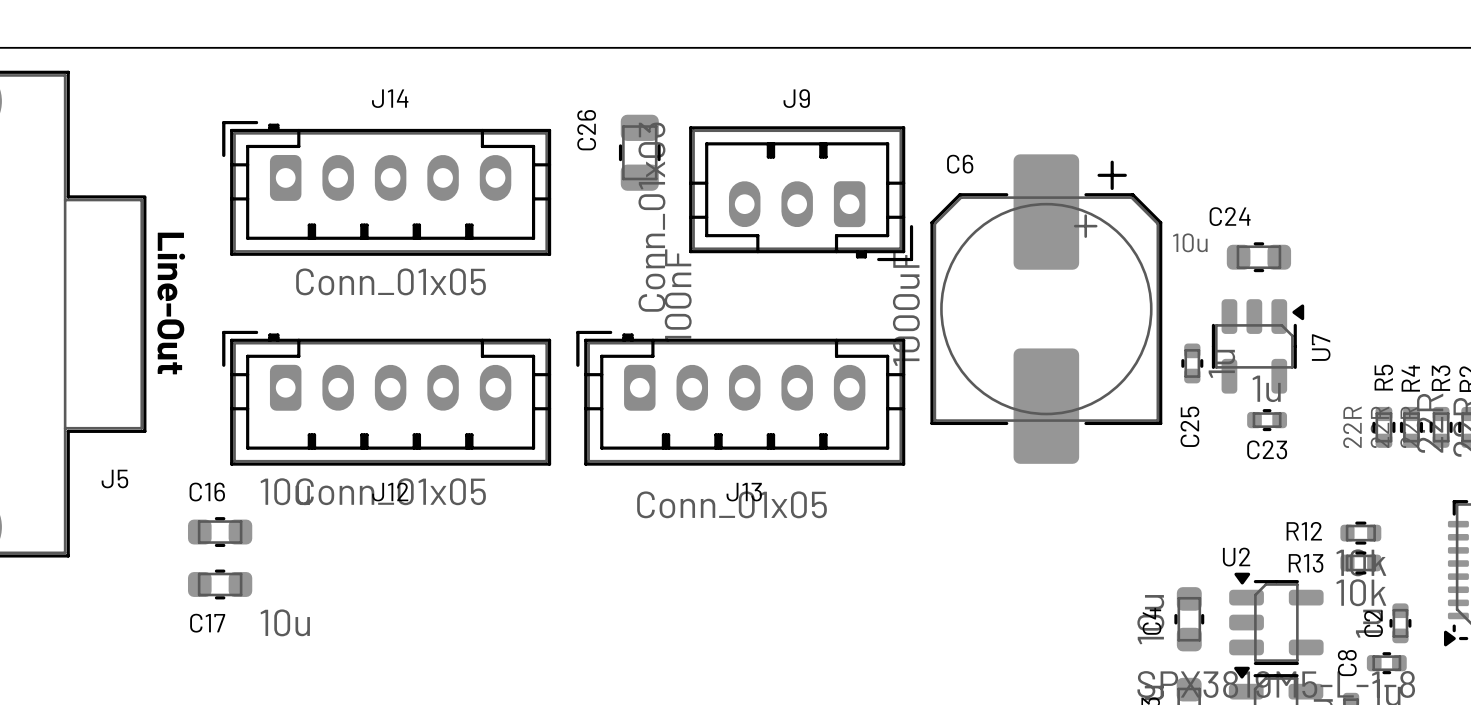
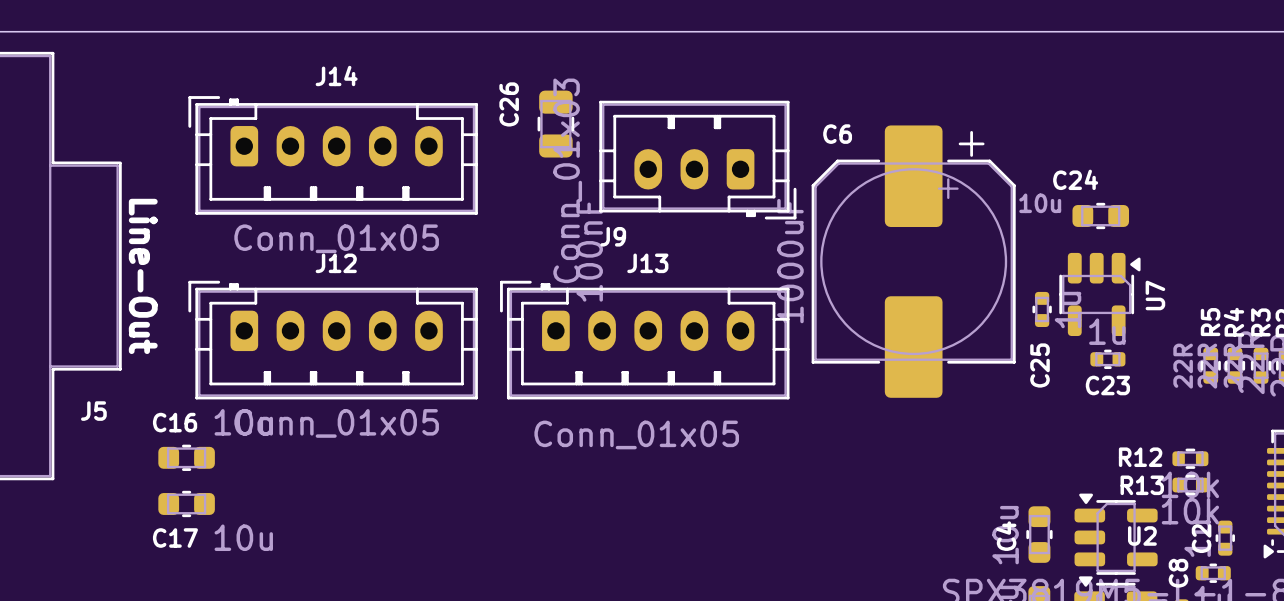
J9 name position: J9 (796, 98) -> J9 (613, 236)
J12 name position: J12 (390, 492) -> J12 (336, 263)
J13 name position: J13 (744, 492) -> J13 (647, 263)
U2 name position: U2 (1236, 557) -> U2 (1142, 535)

